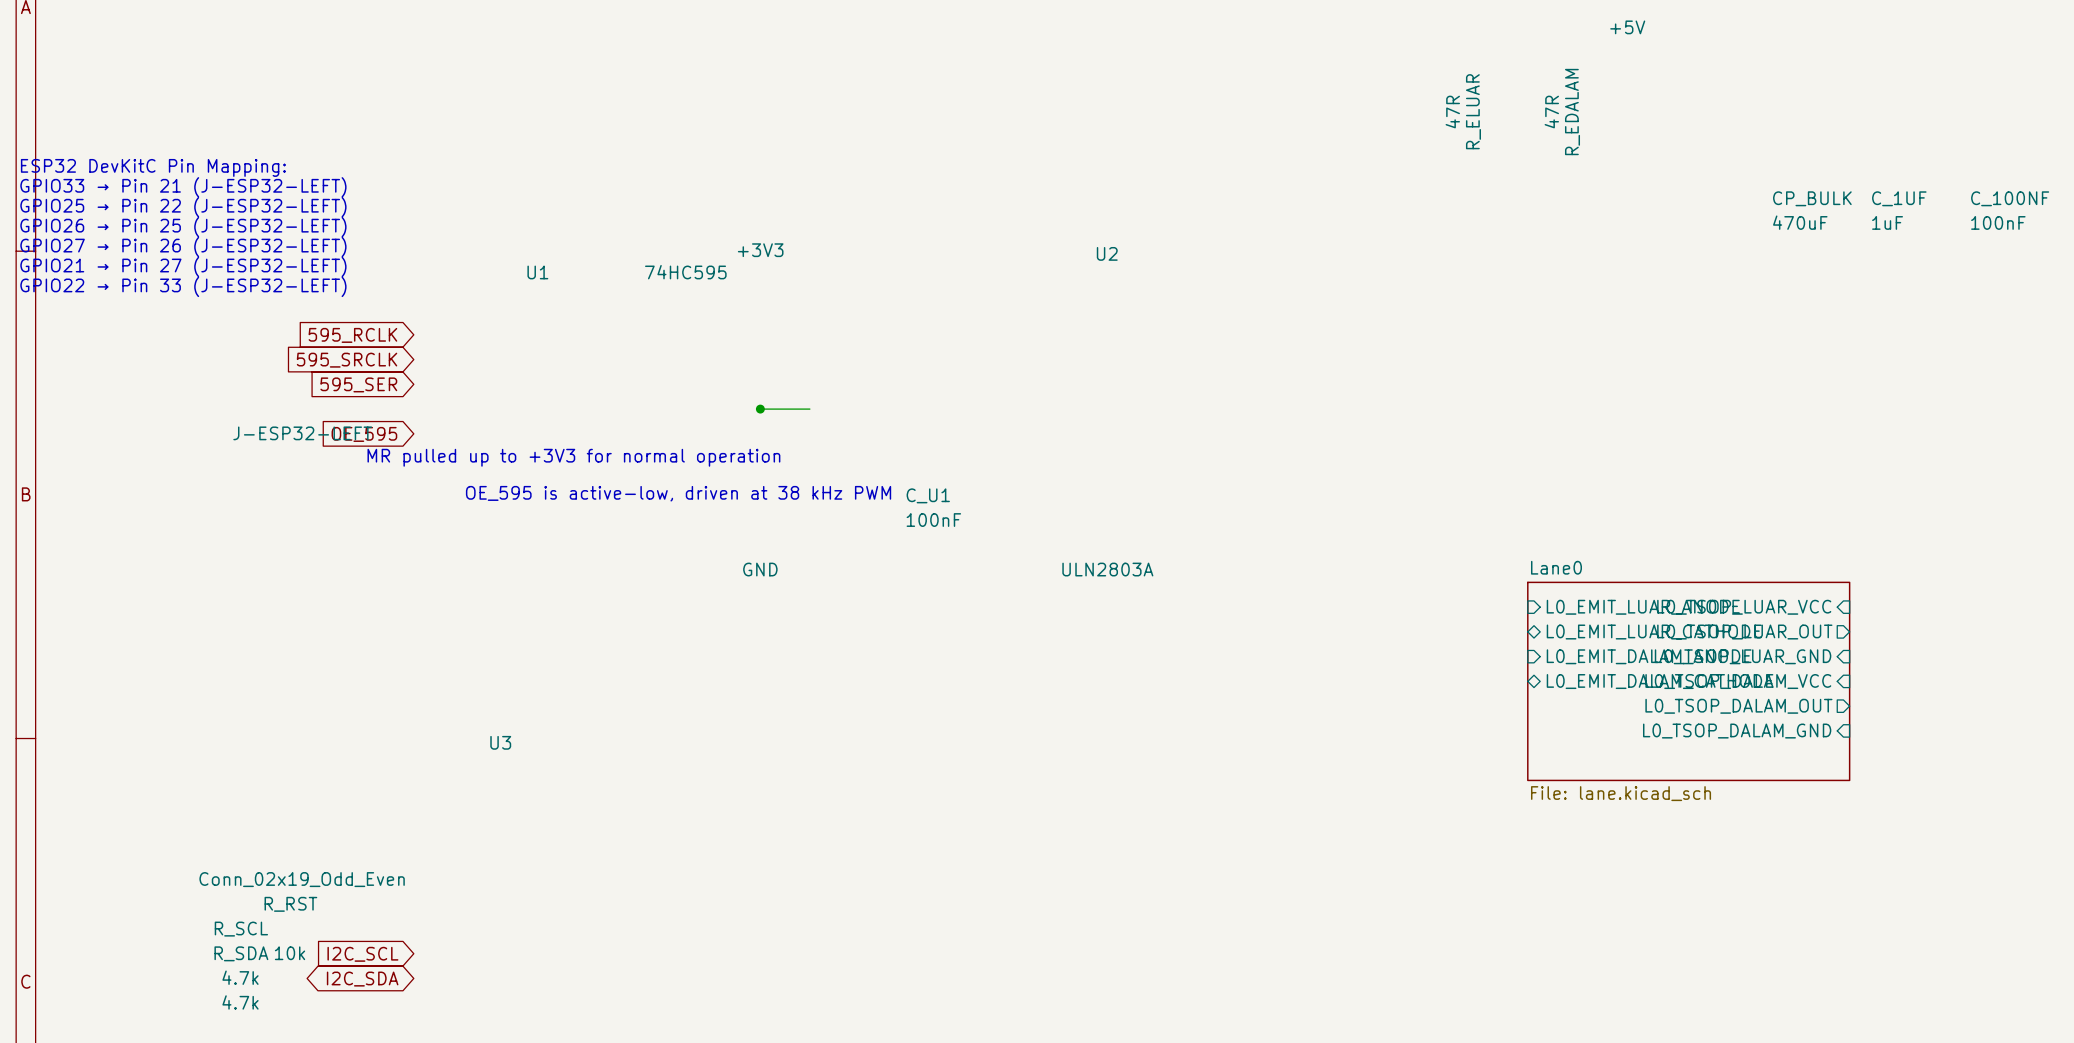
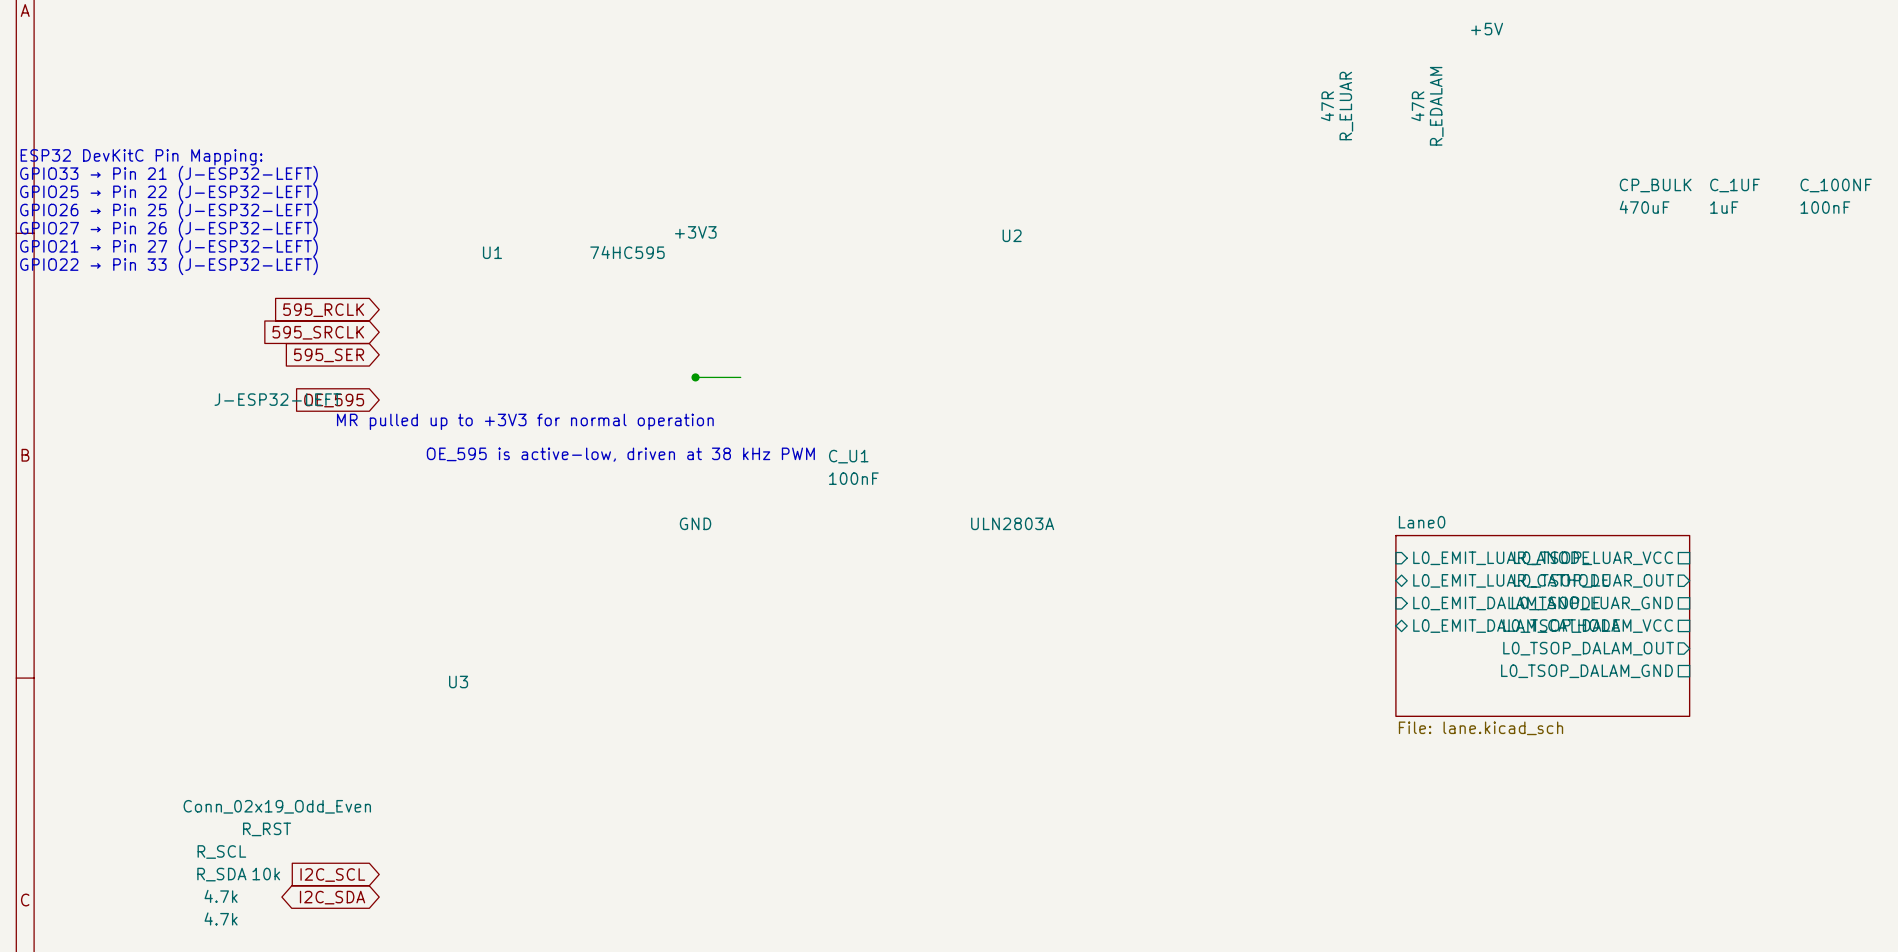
sheet pin shape: input (1744, 607) -> passive (1593, 558)
sheet pin shape: input (1743, 656) -> passive (1592, 603)
sheet pin shape: input (1738, 681) -> passive (1588, 626)
sheet pin shape: input (1737, 731) -> passive (1586, 671)

